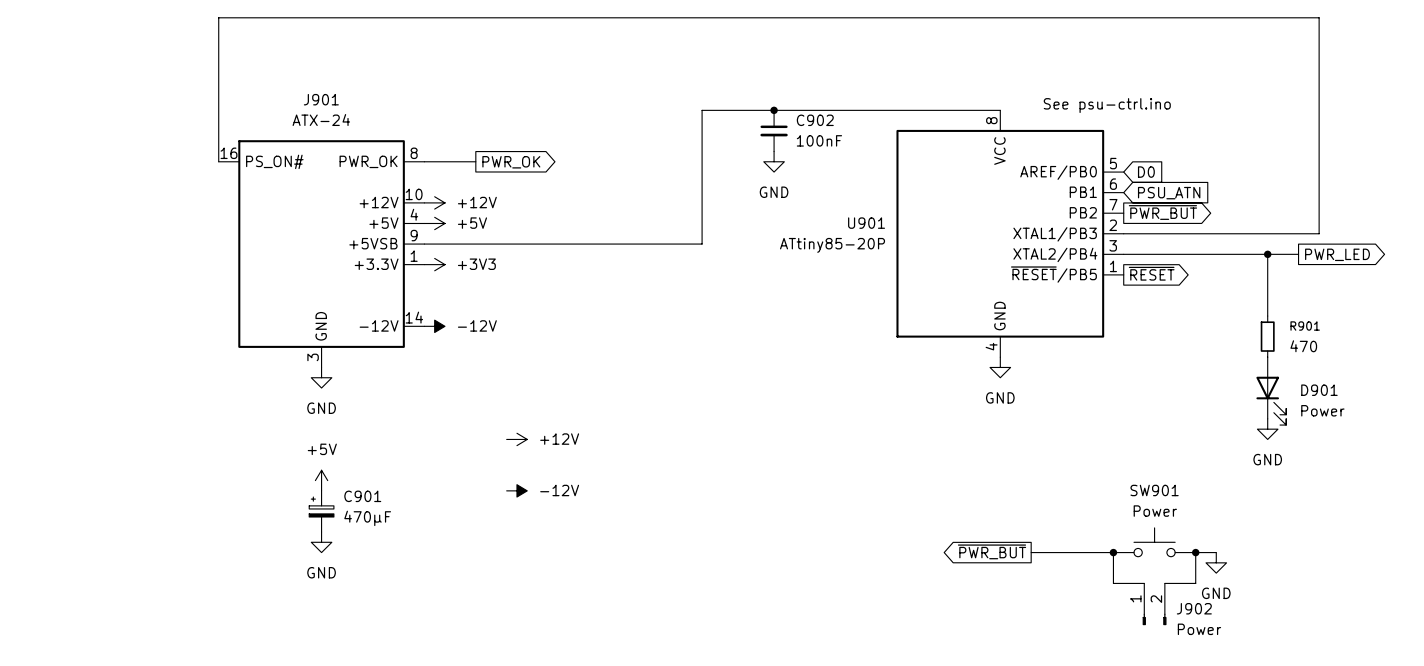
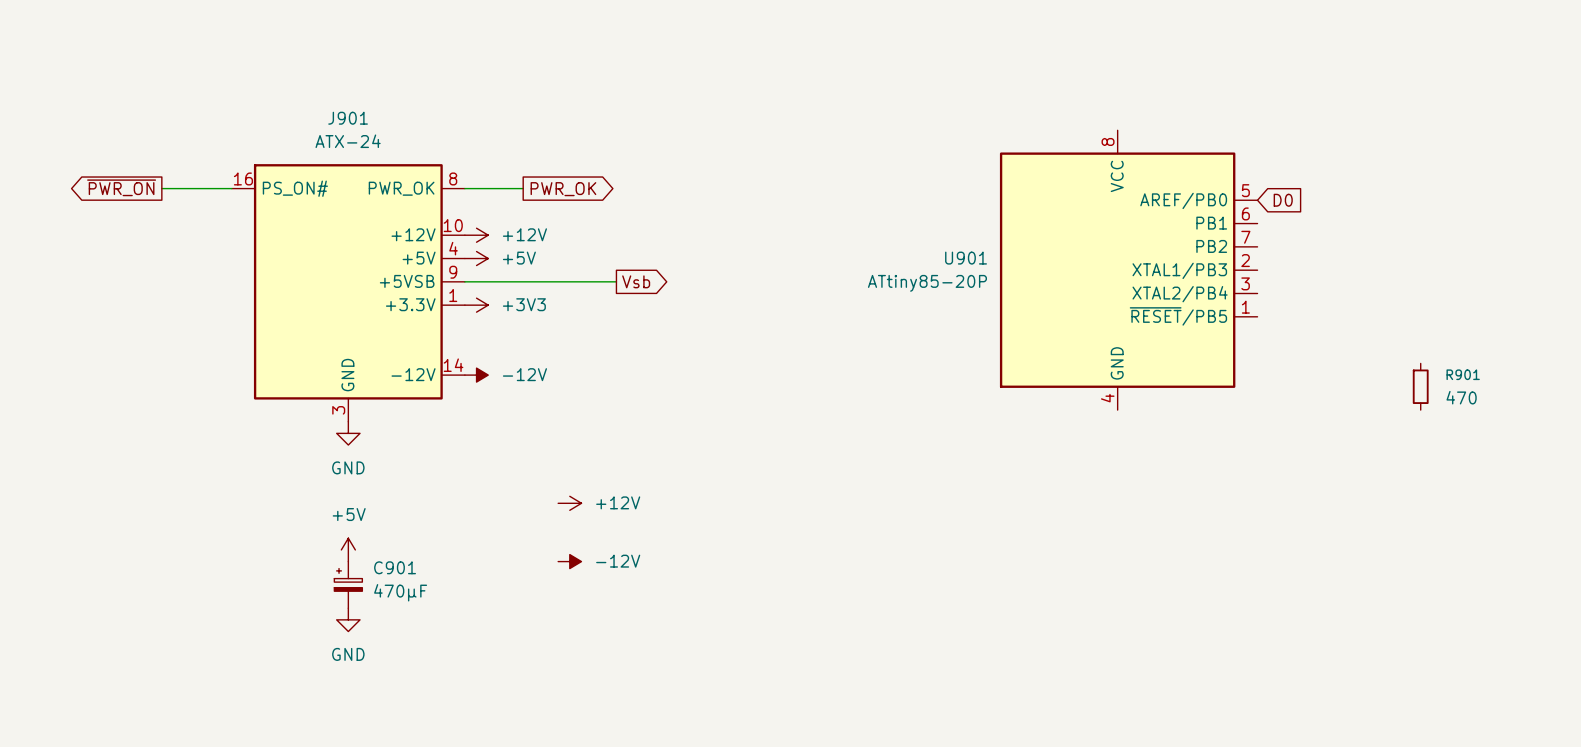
text: See psu-ctrl.ino (1107, 105) -> none
junction: (774, 110) -> none
wire: (1000, 110) (702, 110) (702, 244) (558, 244) -> none
C902: 100nF (774, 130) -> none
global label: none -> ~{PWR_ON} (121, 187)
wire: (218, 161) (218, 17) (1319, 17) (1319, 233) (1123, 233) -> (231, 188) (161, 188)
power symbol: GND (774, 161) -> none
global label: PSU_ATN (1169, 193) -> none
global label: ~{PWR_BUT} (1162, 212) -> none
global label: none -> Vsb (636, 281)
wire: (1123, 254) (1298, 254) -> none
wire: (1267, 254) (1267, 316) -> none
junction: (1267, 254) -> none
global label: PWR_LED (1337, 254) -> none
global label: ~{RESET} (1151, 273) -> none
power symbol: GND (1000, 367) -> none
D901: Power (1271, 391) -> none
power symbol: GND (1267, 429) -> none
SW901: Power (1154, 542) -> none
global label: ~{PWR_BUT} (992, 551) -> none
wire: (1031, 552) (1113, 552) (1113, 583) (1144, 583) -> none
junction: (1113, 552) -> none
junction: (1195, 552) -> none
wire: (1216, 552) (1195, 552) (1195, 583) (1164, 583) -> none
power symbol: GND (1216, 562) -> none
J902: Power (1154, 604) -> none

